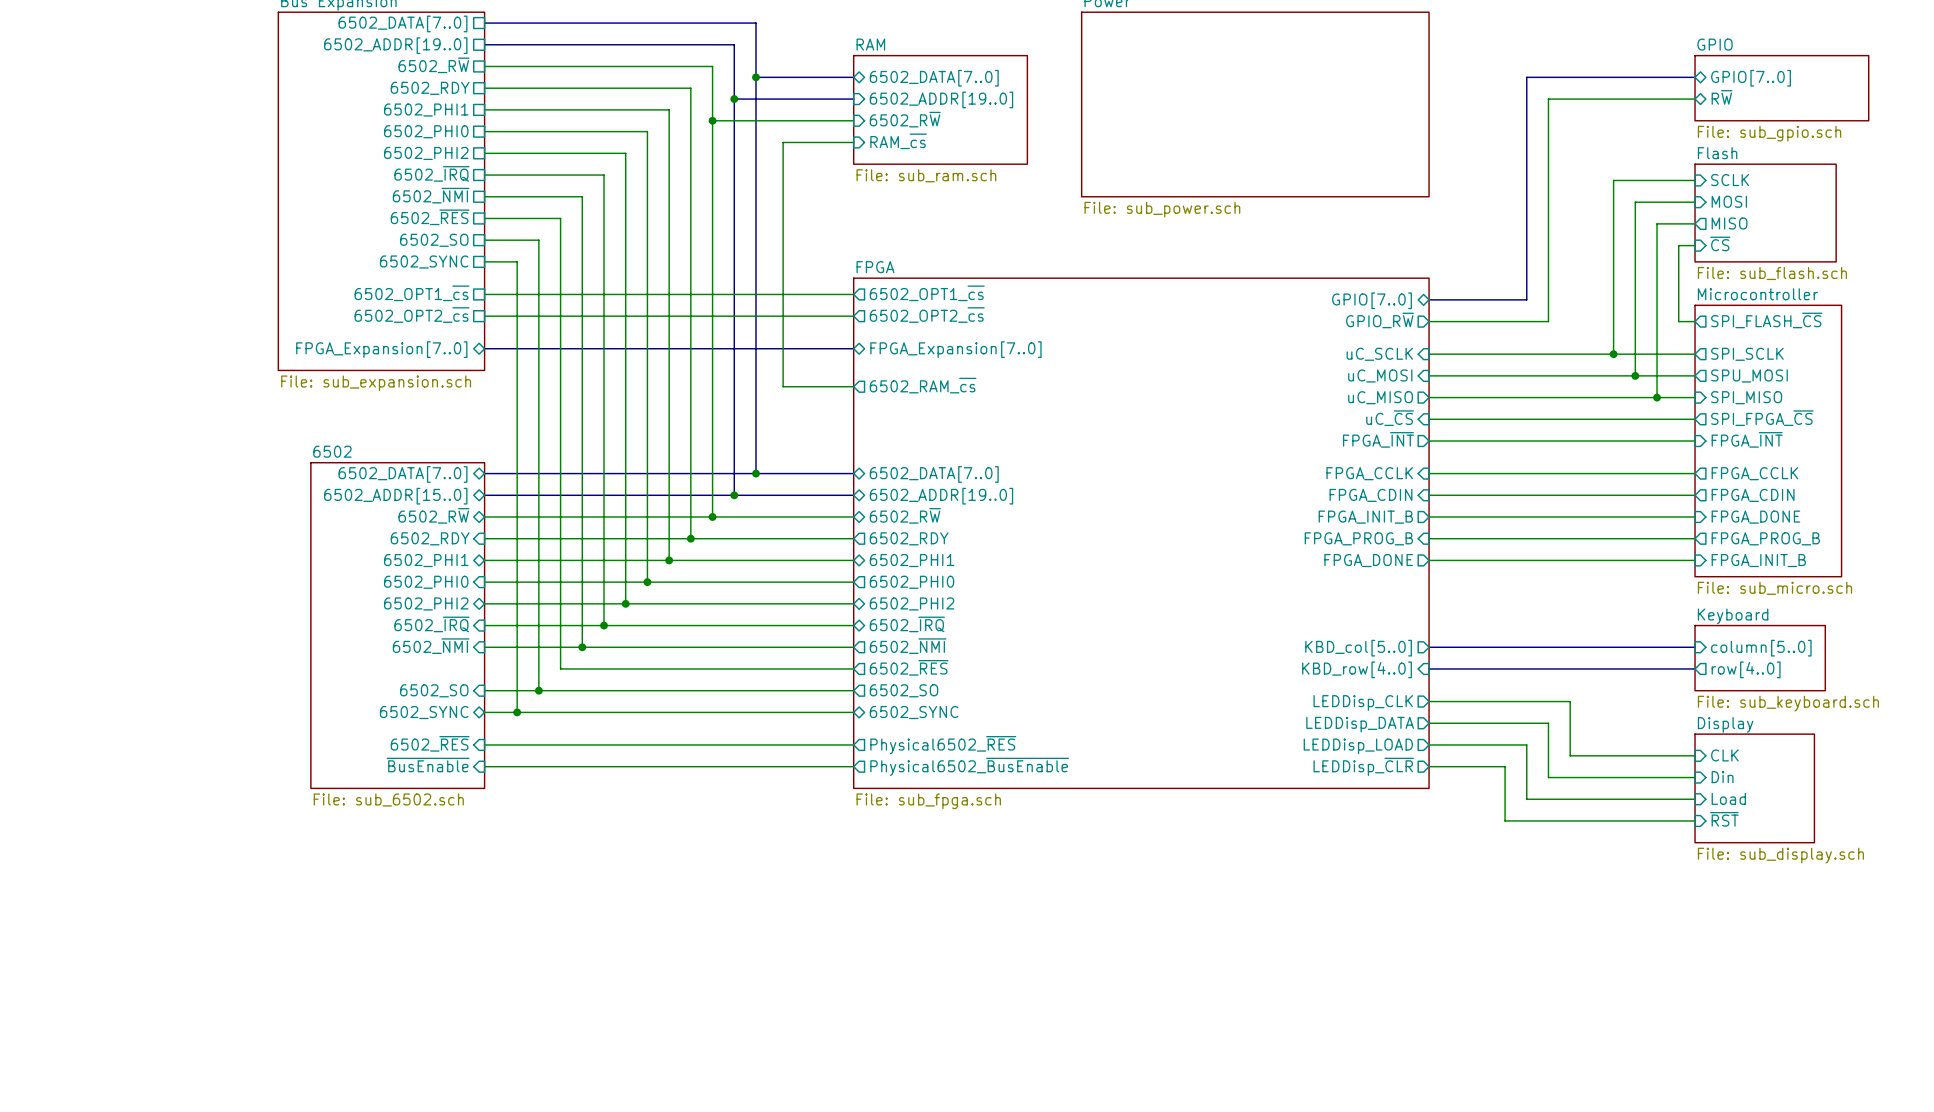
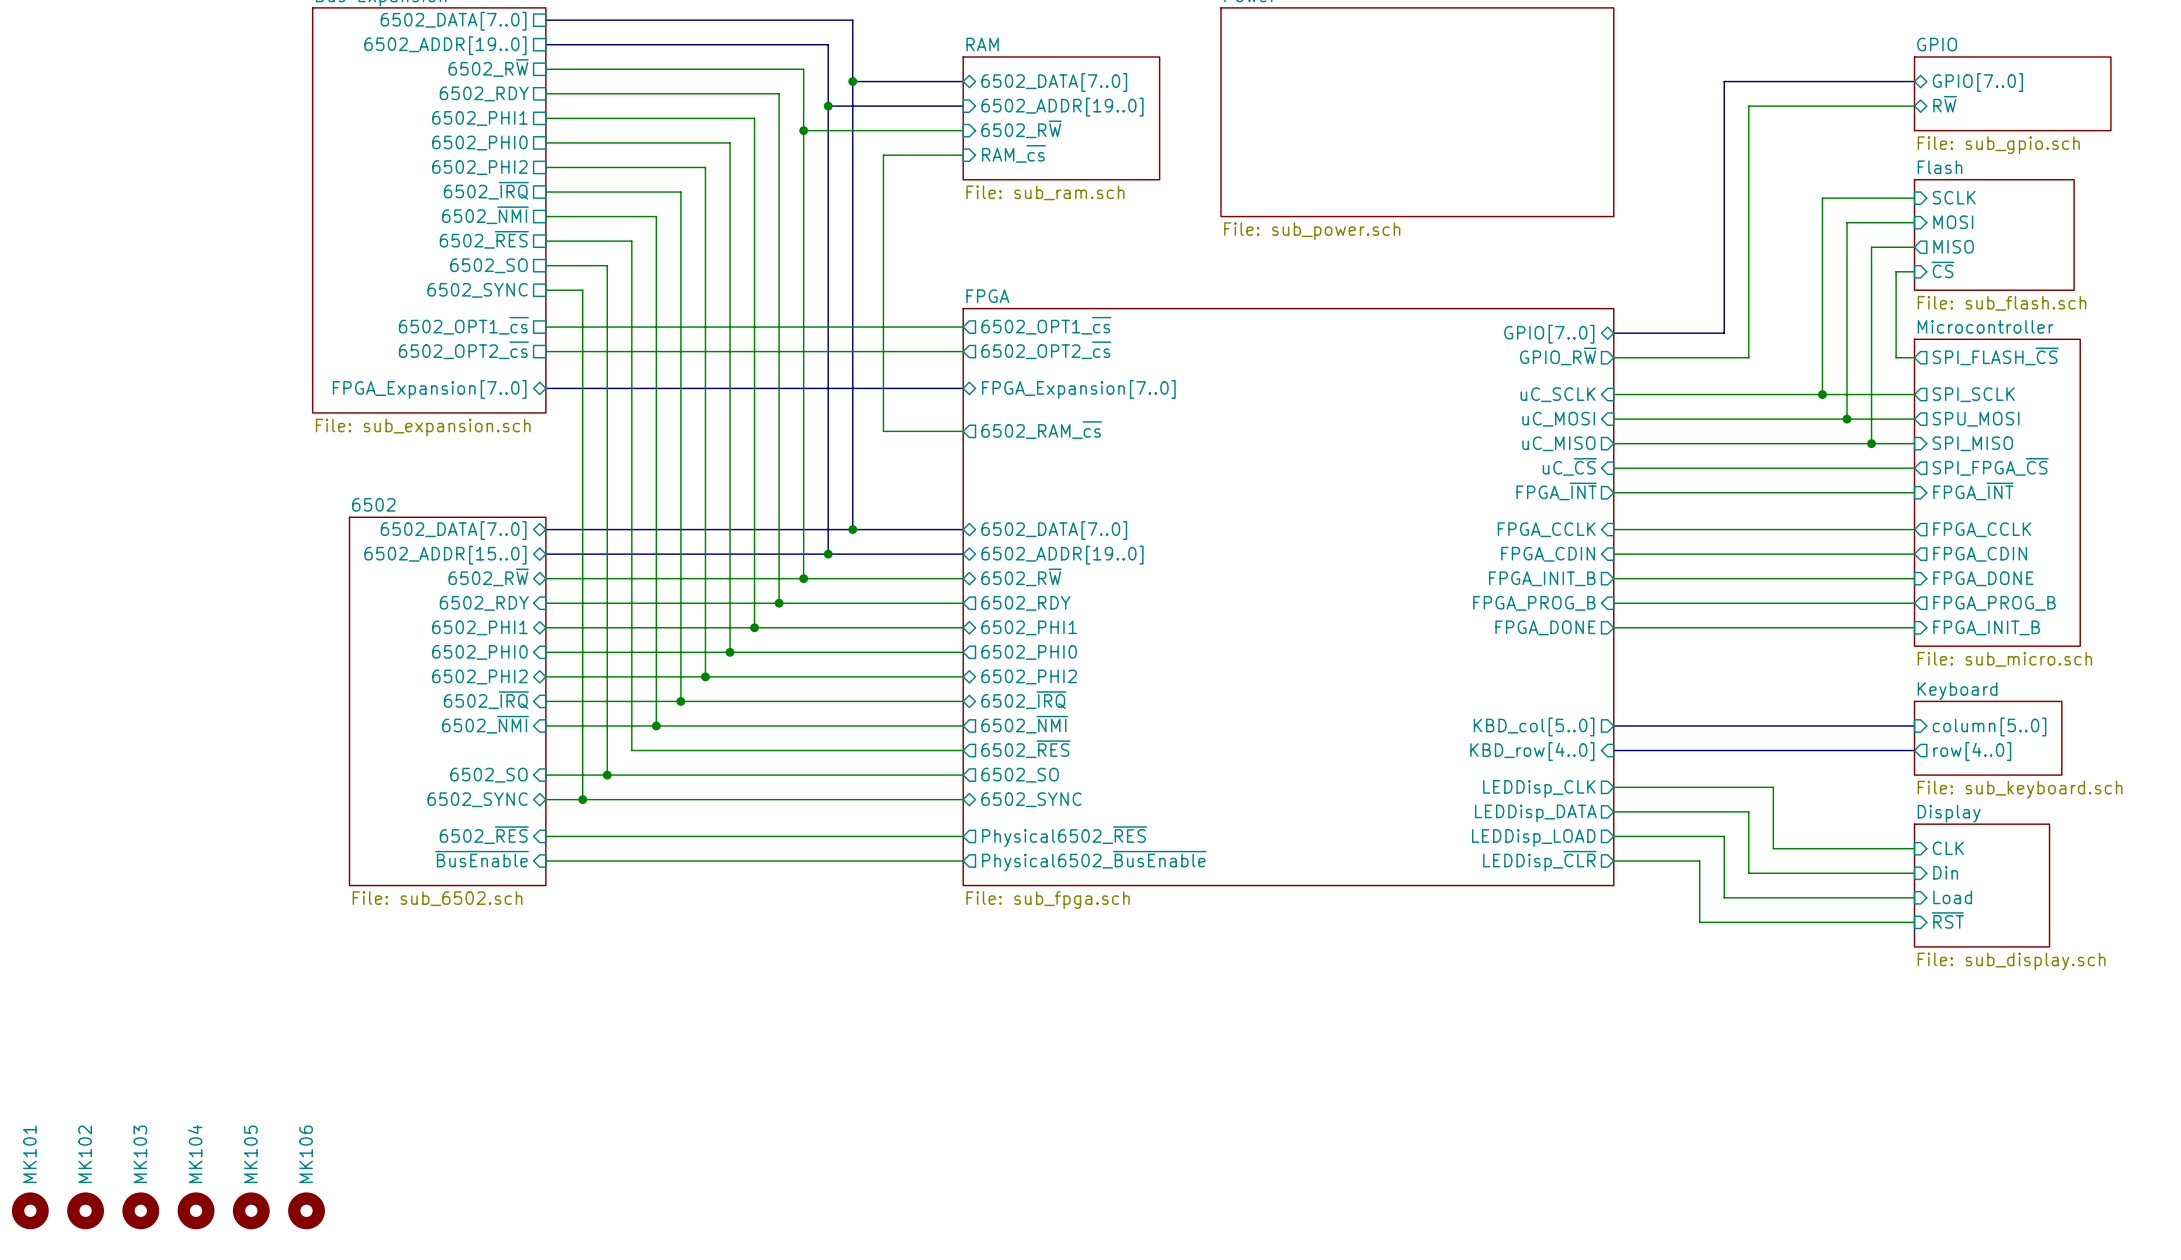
MK101: none -> (30, 1210)
MK102: none -> (85, 1210)
MK103: none -> (140, 1210)
MK104: none -> (196, 1210)
MK105: none -> (251, 1210)
MK106: none -> (306, 1210)

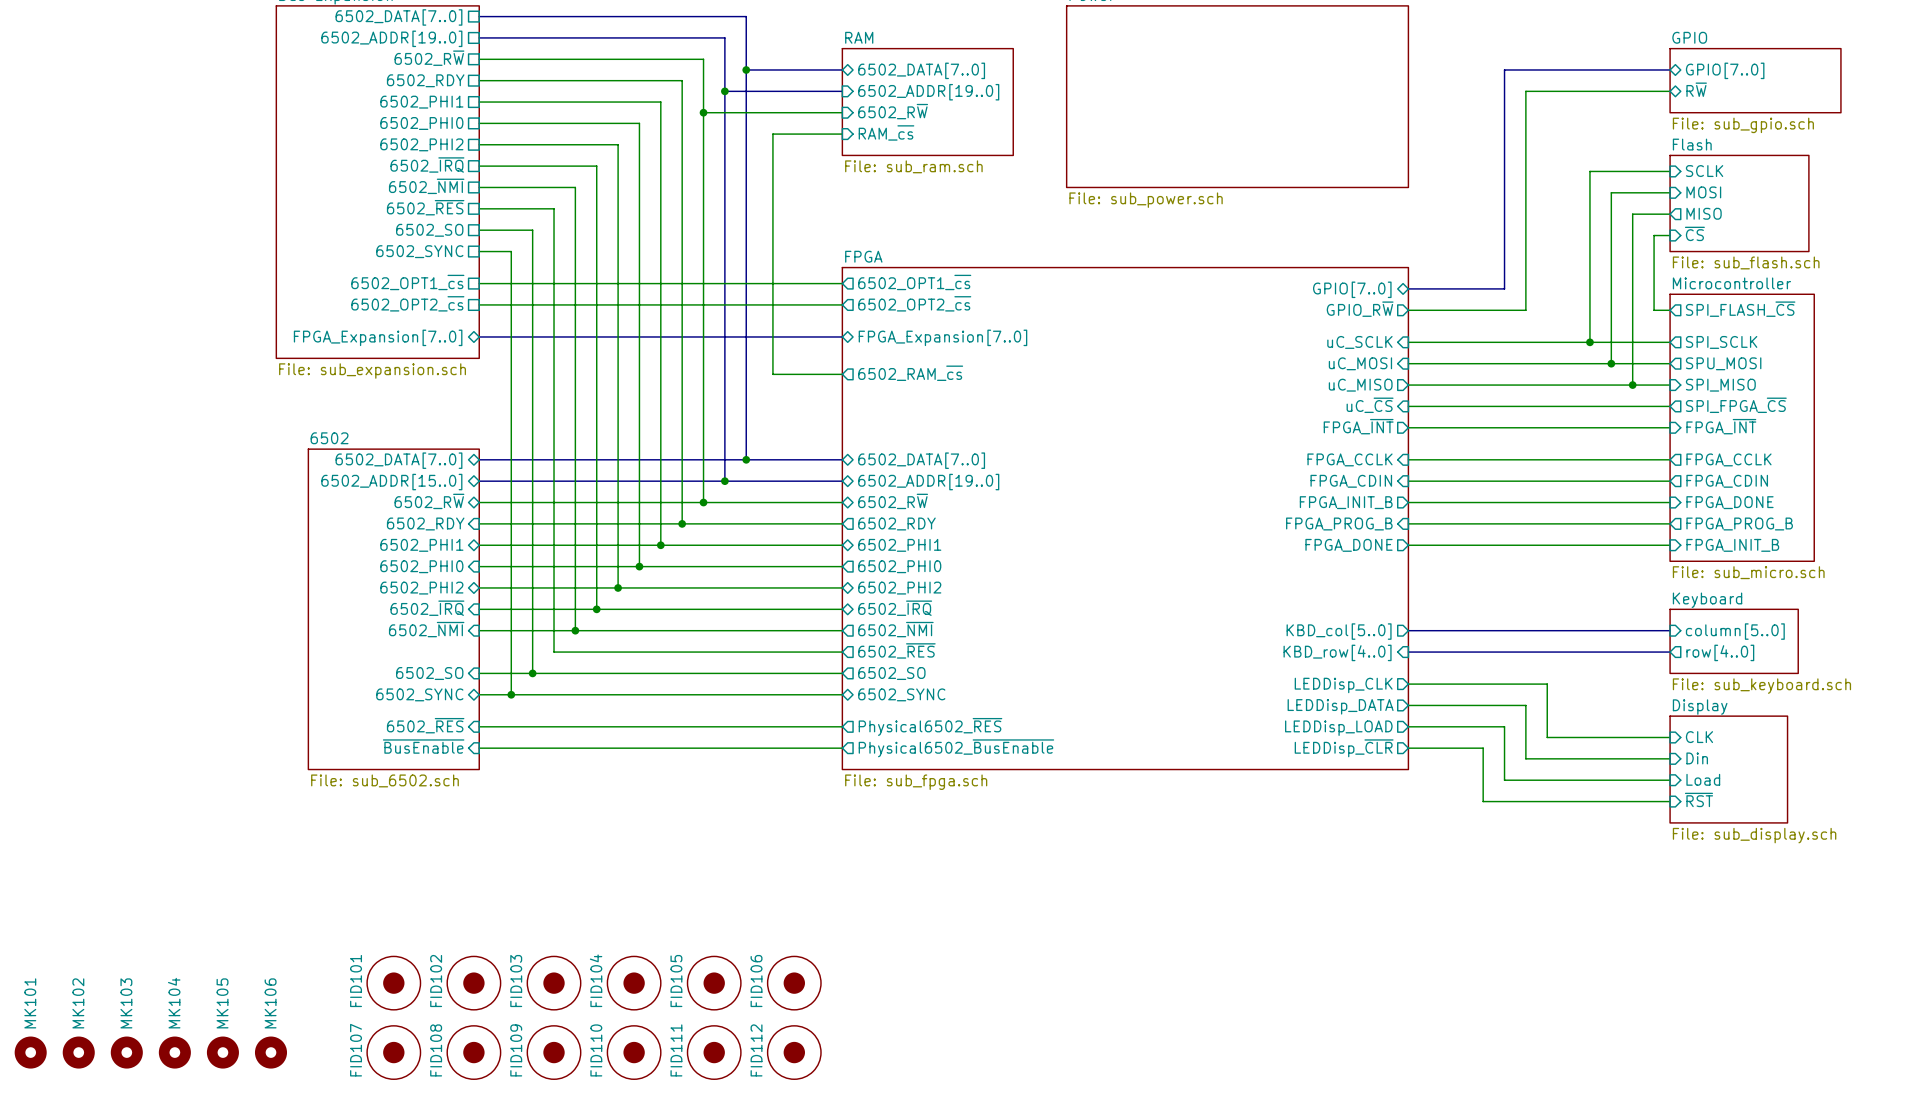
FID101: none -> (393, 983)
FID102: none -> (473, 983)
FID103: none -> (554, 983)
FID104: none -> (634, 983)
FID105: none -> (714, 983)
FID106: none -> (794, 983)
FID107: none -> (393, 1052)
FID108: none -> (473, 1052)
FID109: none -> (554, 1052)
FID110: none -> (634, 1052)
FID111: none -> (714, 1052)
FID112: none -> (794, 1052)

